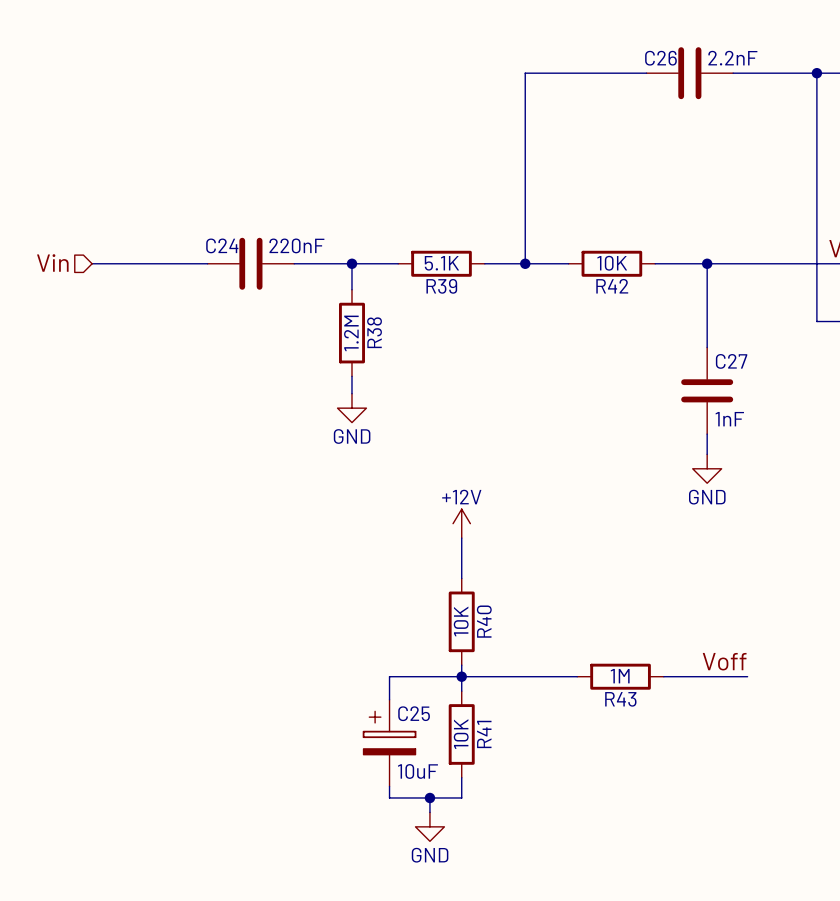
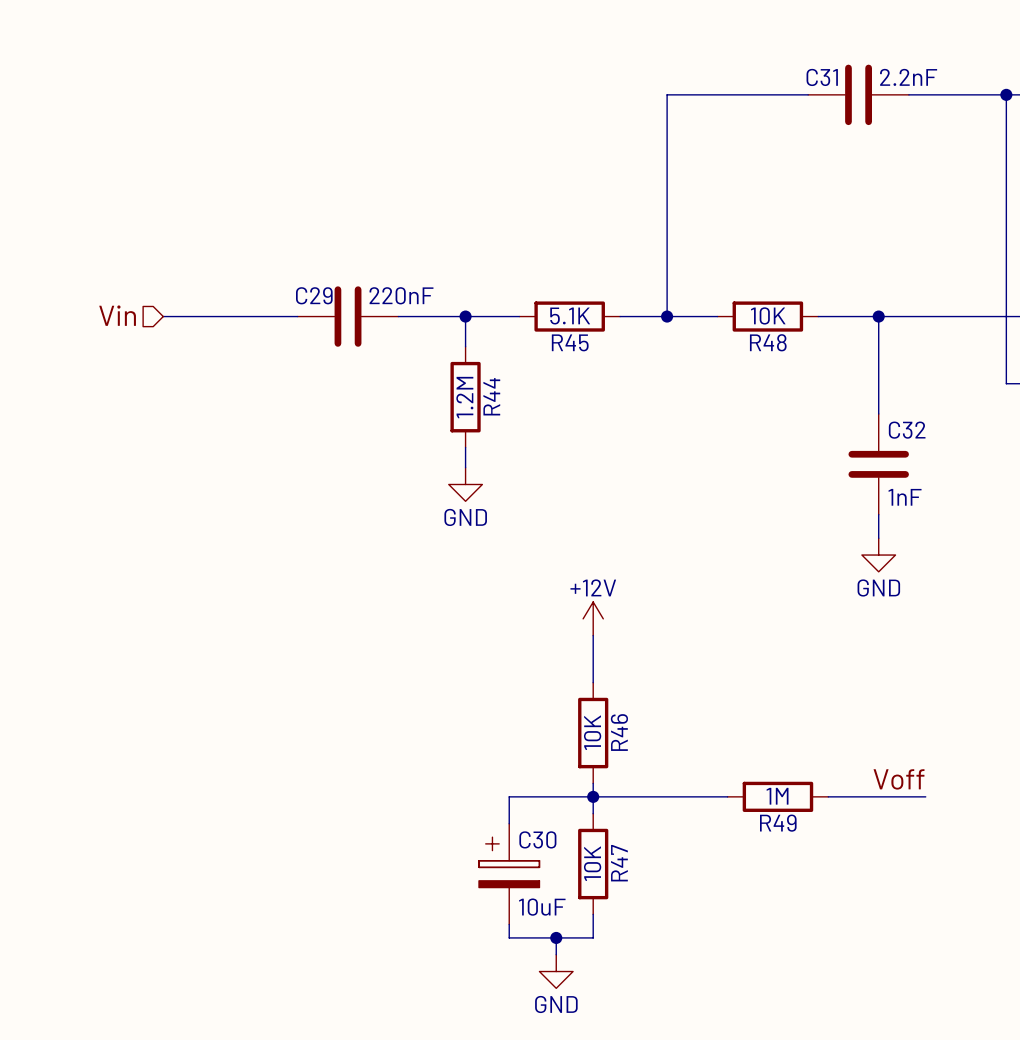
C26 name: C26 (660, 58) -> C31 (822, 77)
C24 name: C24 (222, 245) -> C29 (314, 295)
R39 name: R39 (441, 286) -> R45 (570, 342)
R42 name: R42 (612, 286) -> R48 (768, 342)
R38 name: R38 (374, 332) -> R44 (491, 396)
C27 name: C27 (731, 361) -> C32 (907, 430)
R40 name: R40 (484, 621) -> R46 (619, 732)
R43 name: R43 (620, 699) -> R49 (778, 823)
C25 name: C25 (414, 713) -> C30 (537, 839)
R41 name: R41 (484, 734) -> R47 (619, 863)

